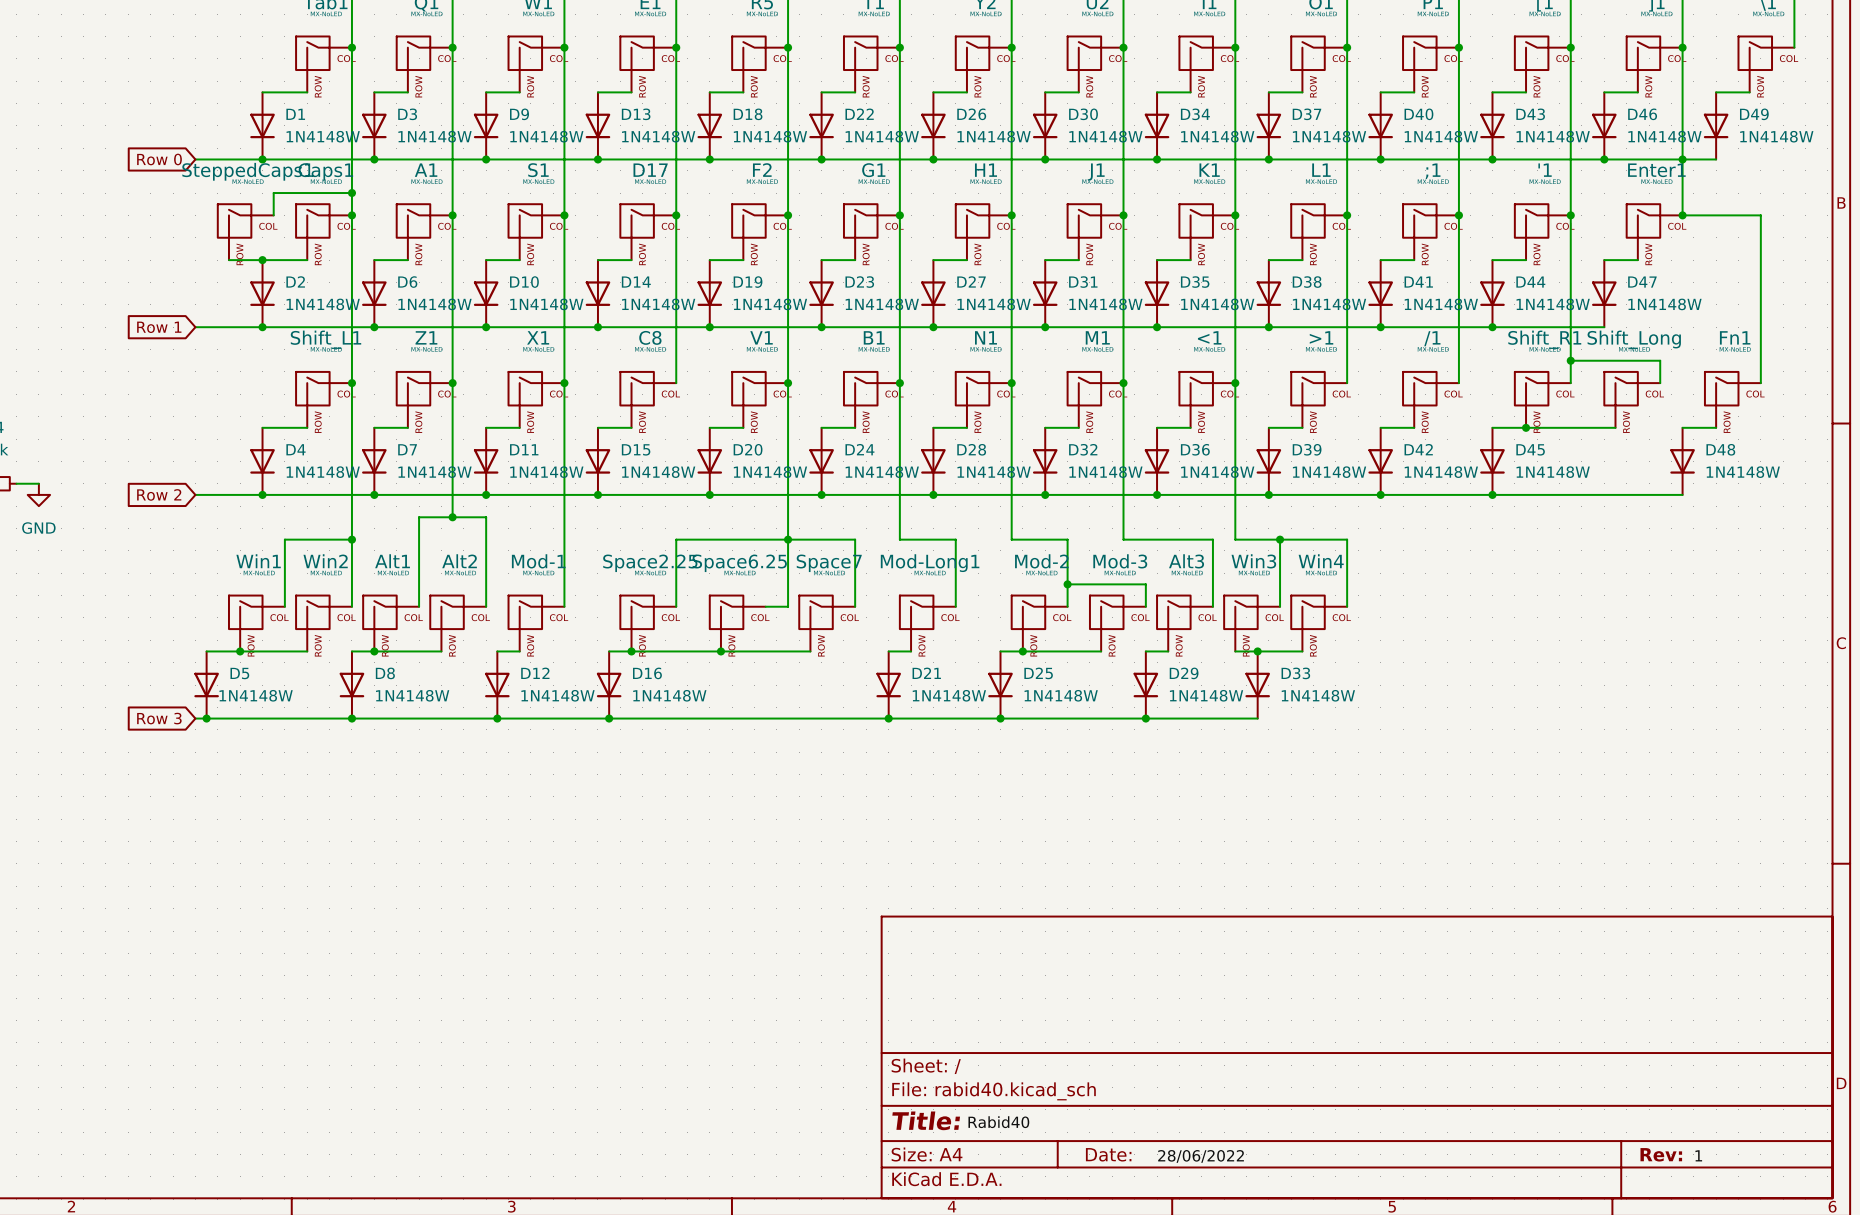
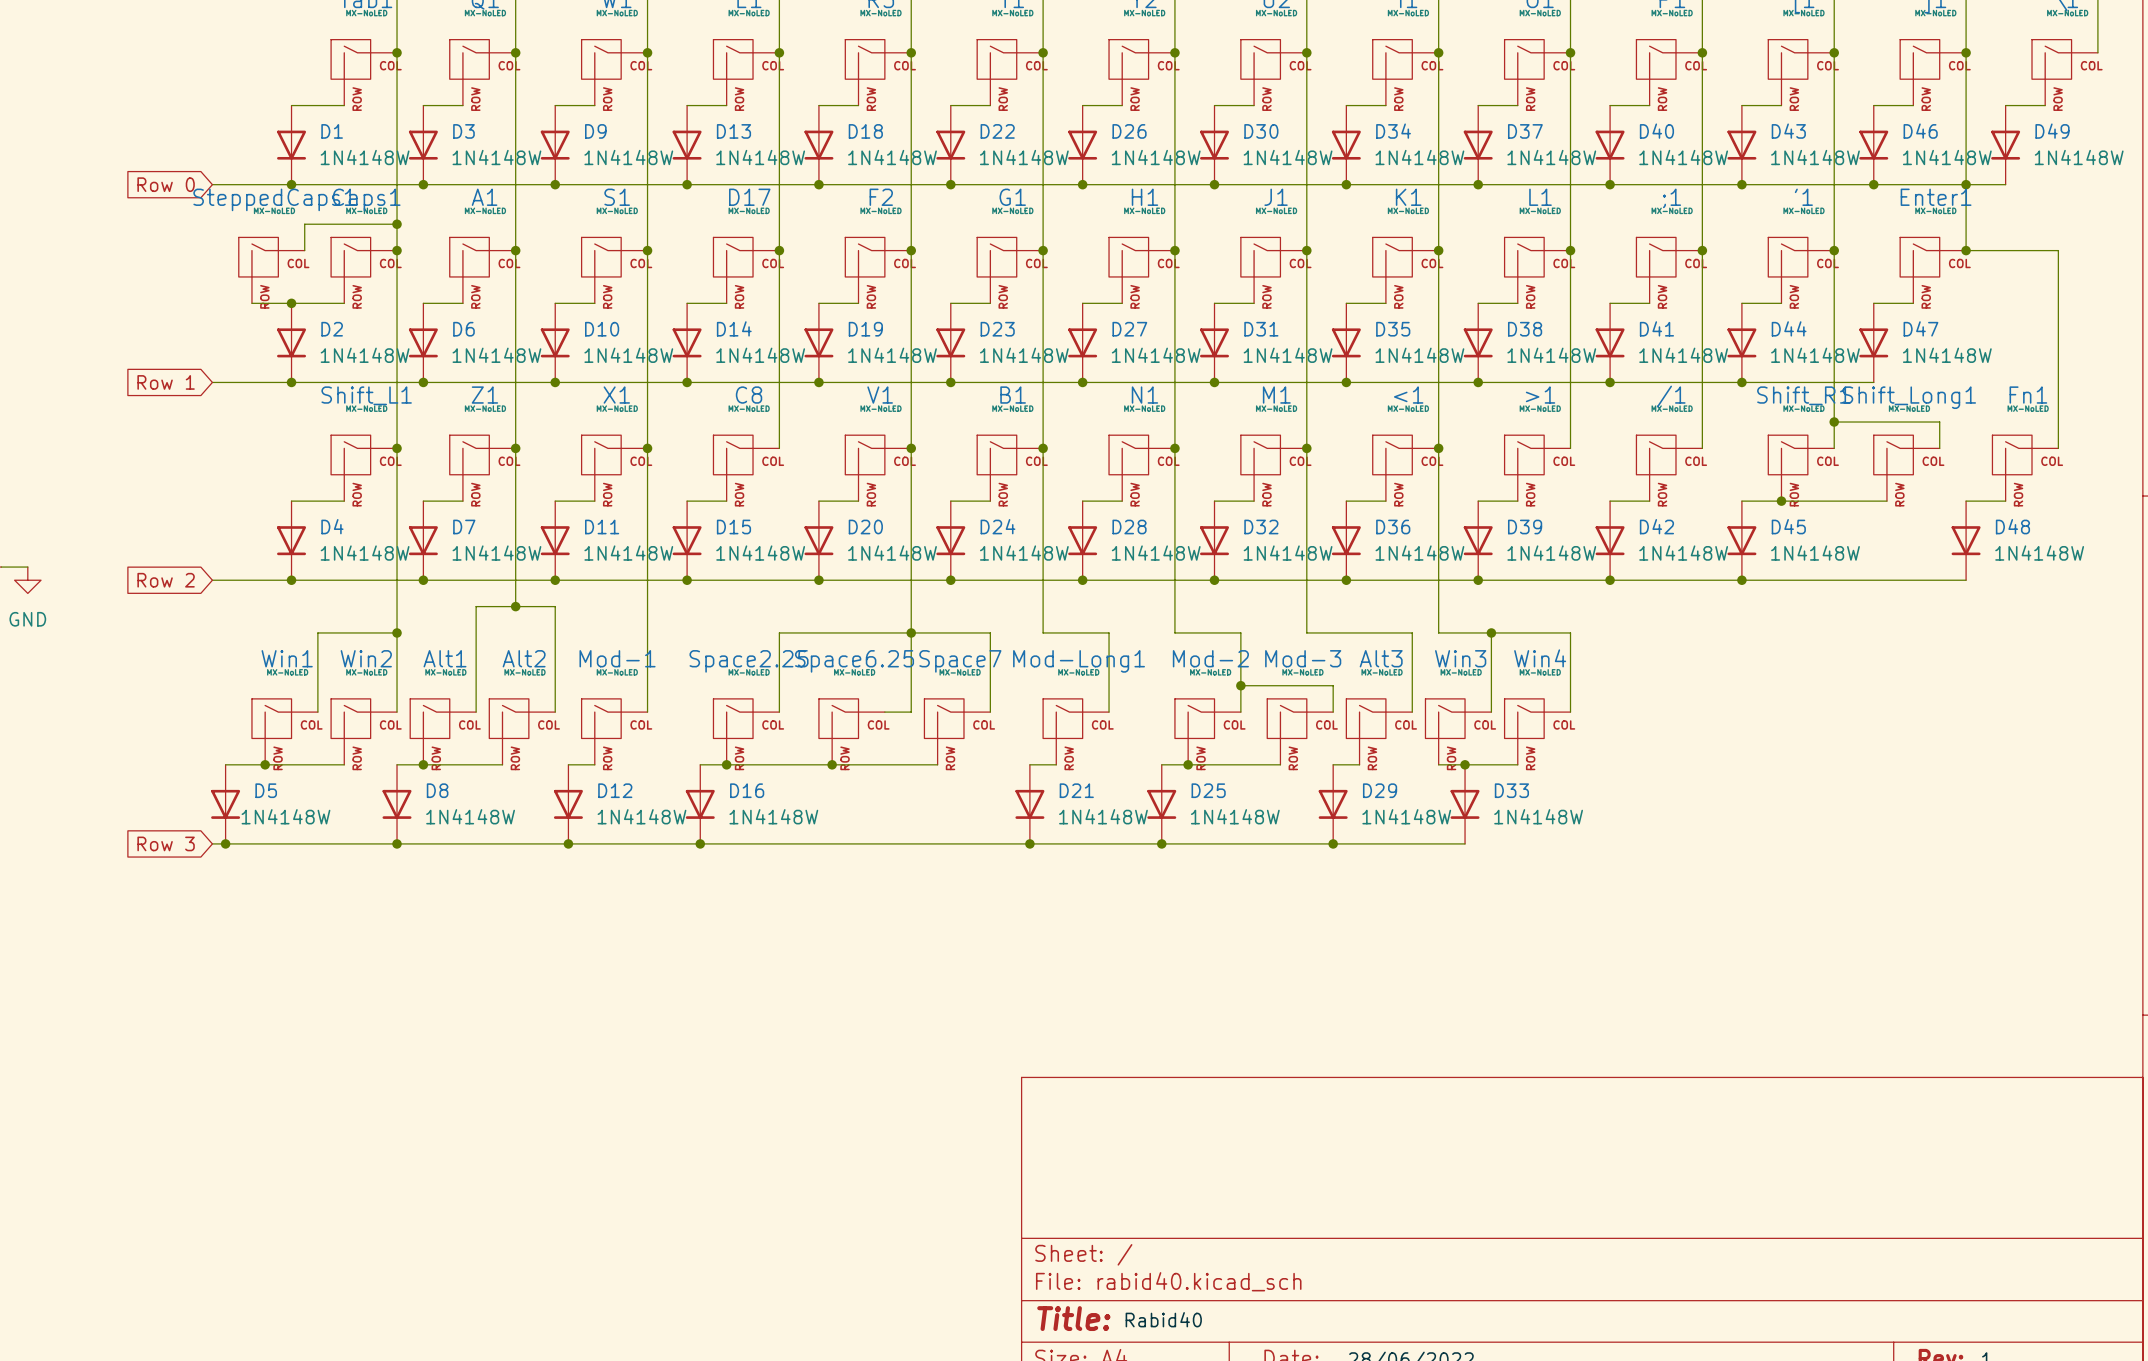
Shift_Long name: Shift_Long (1634, 339) -> Shift_Long1 (1909, 397)

